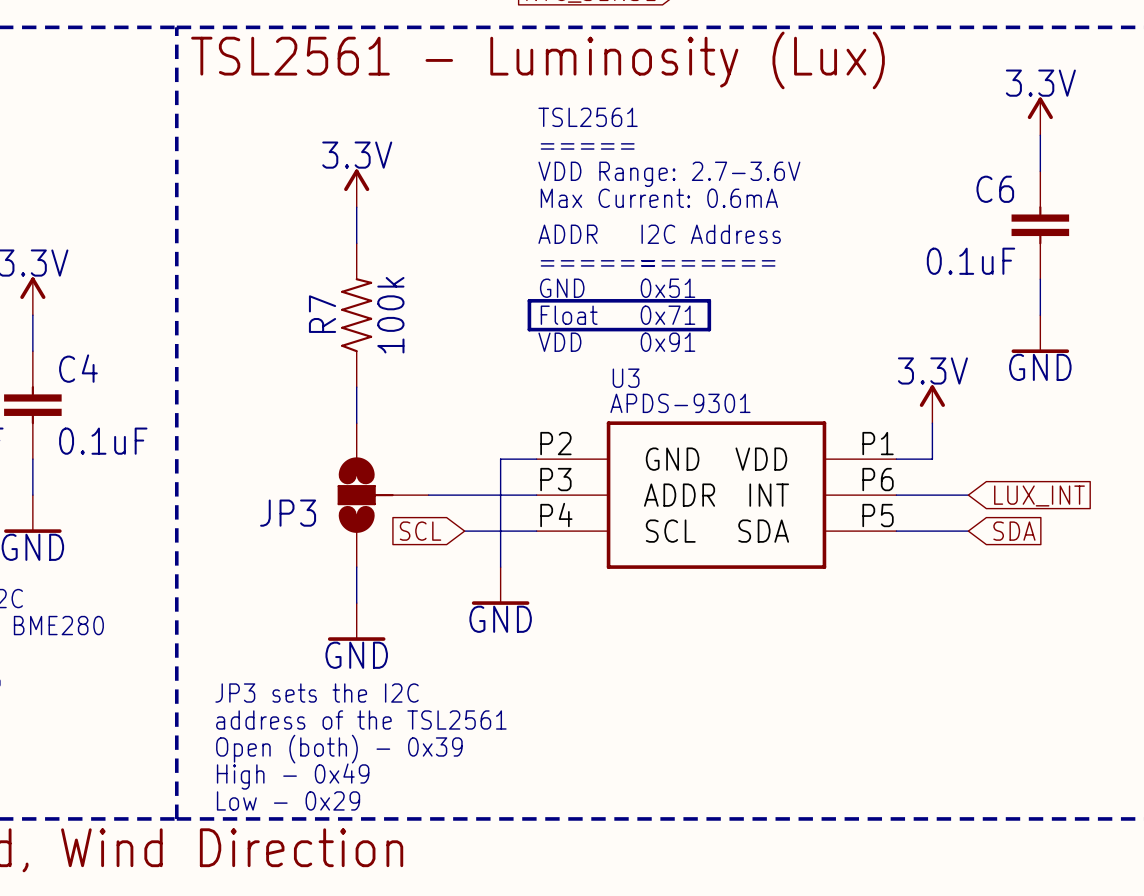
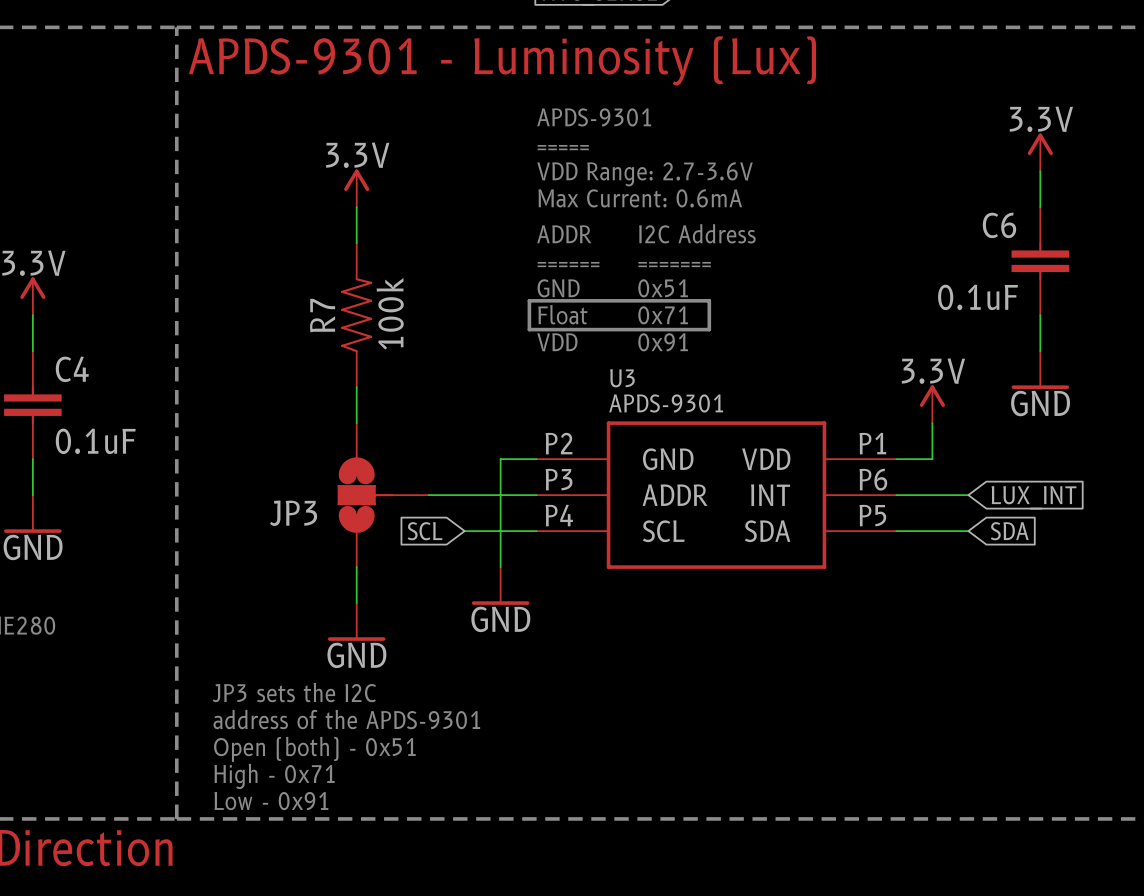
text: TSL2561 - Luminosity (Lux) (537, 60) -> APDS-9301 - Luminosity (Lux) (502, 60)
power symbol position: 3.3V (1040, 116) -> 3.3V (1040, 152)
text: TSL2561 (588, 117) -> APDS-9301 (594, 117)
C6 position: (1040, 225) -> (1040, 261)
power symbol position: GND (1040, 334) -> GND (1040, 370)
text: address of the TSL2561 (361, 720) -> address of the APDS-9301 (346, 719)
text: Open (both) - 0x39 (339, 749) -> Open (both) - 0x51 (314, 749)
text: High - 0x49 (293, 776) -> High - 0x71 (274, 776)
text: Low - 0x29 (288, 800) -> Low - 0x91 (271, 801)

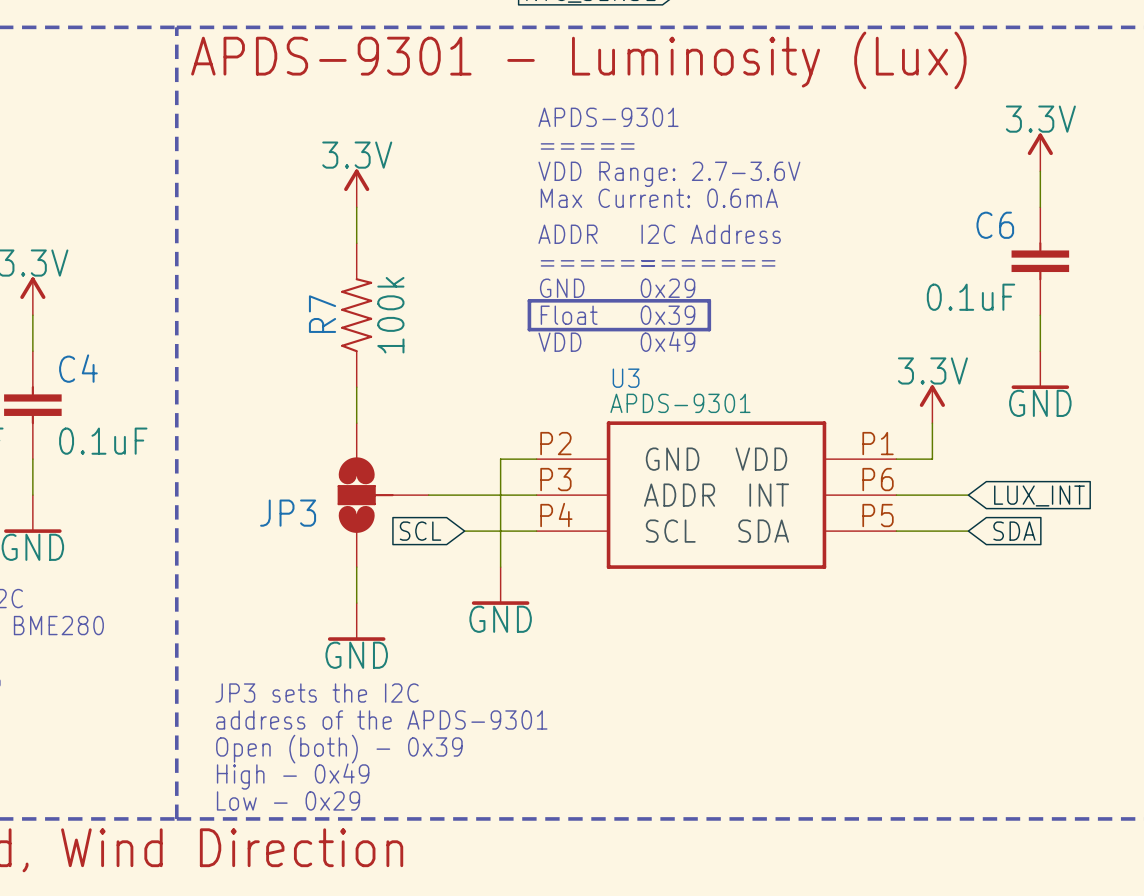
text: 0x51 (663, 288) -> 0x29 (667, 288)
text: 0x71 (663, 315) -> 0x39 (667, 315)
text: 0x91 (663, 342) -> 0x49 (667, 341)
text: Open (both) - 0x51 (314, 749) -> Open (both) - 0x39 (339, 749)
text: High - 0x71 (274, 776) -> High - 0x49 (293, 776)
text: Low - 0x91 (271, 801) -> Low - 0x29 (288, 800)

